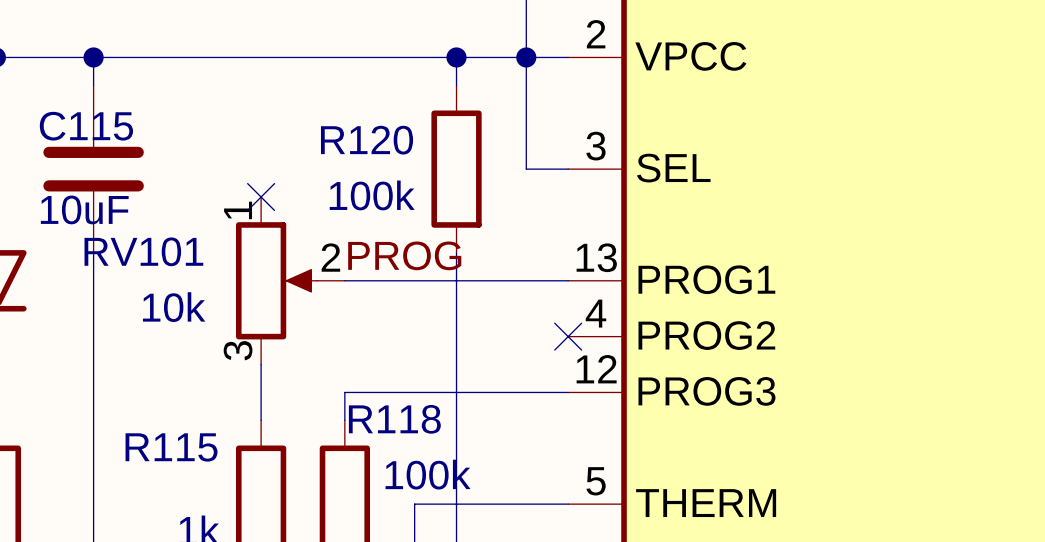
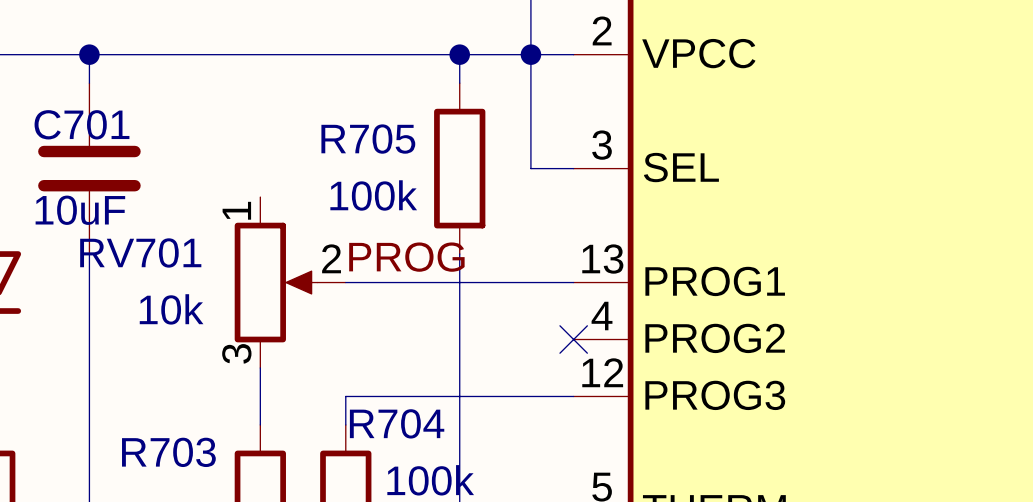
C115 name: C115 (86, 126) -> C701 (81, 124)
R120 name: R120 (367, 140) -> R705 (368, 139)
no-connect mark: (261, 197) -> none
RV101 name: RV101 (143, 251) -> RV701 (140, 252)
R118 name: R118 (394, 419) -> R704 (397, 423)
R115 name: R115 (171, 447) -> R703 (168, 452)

